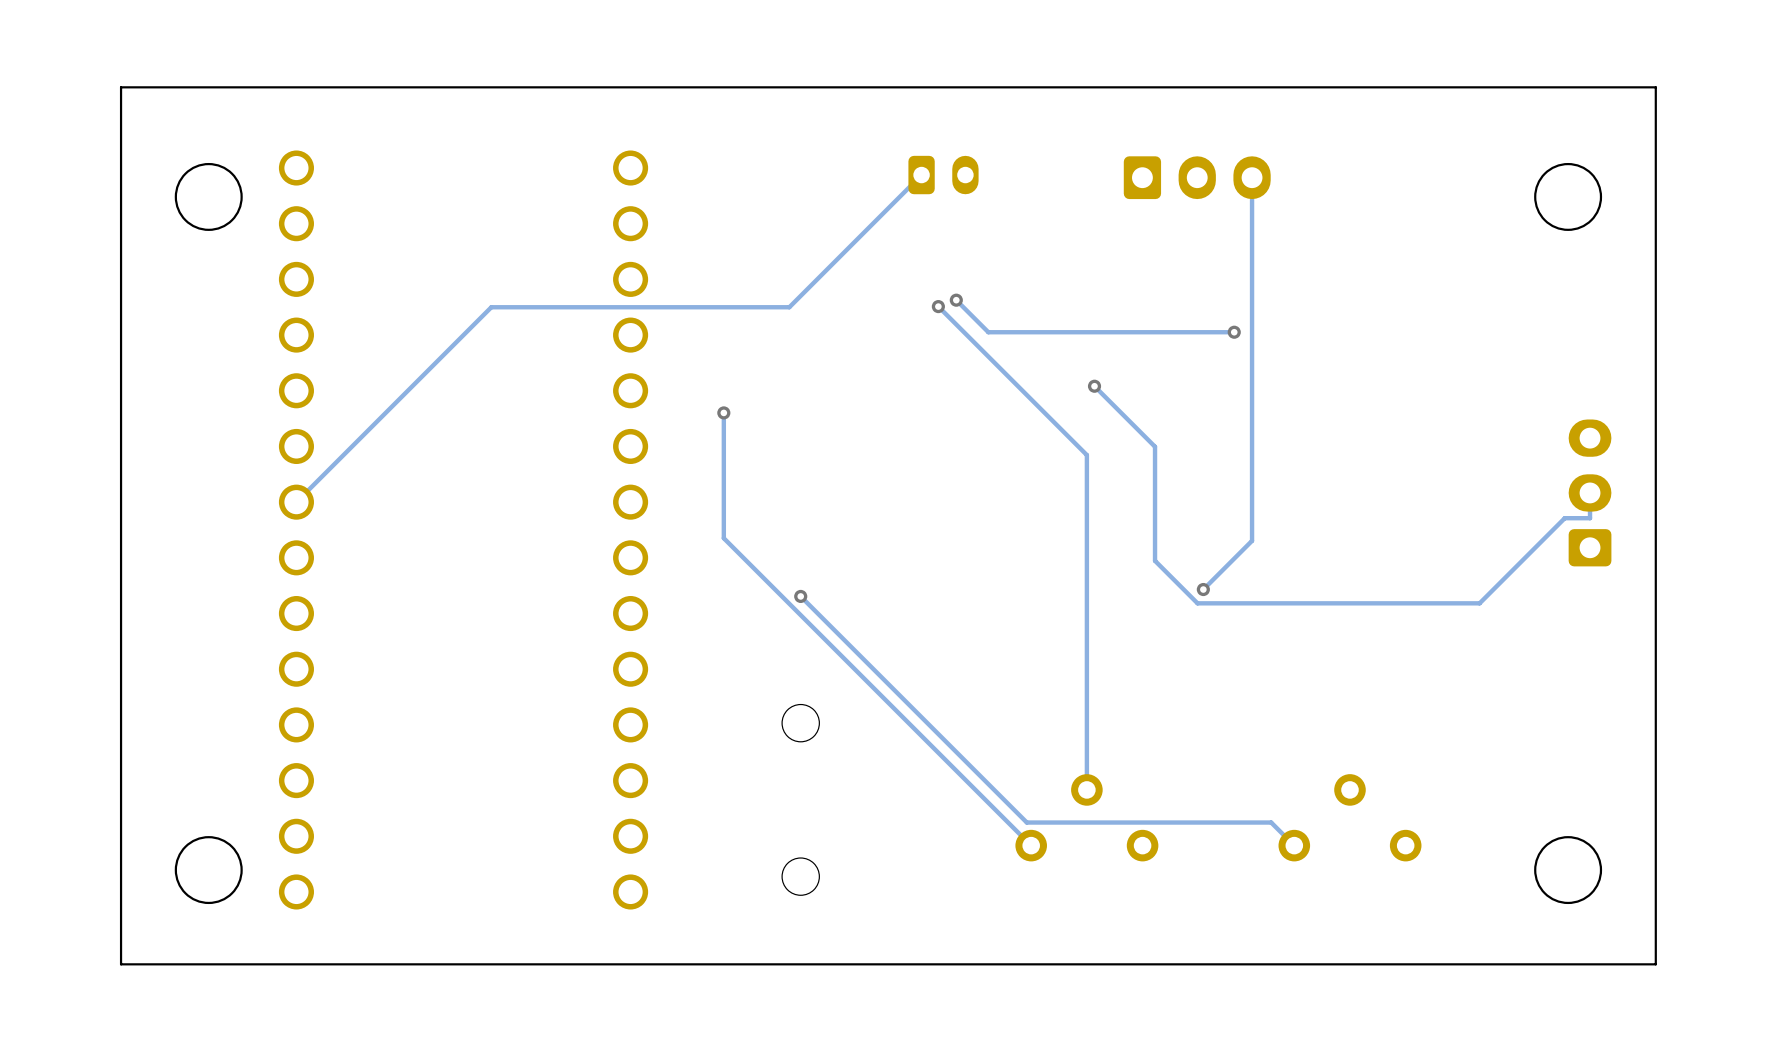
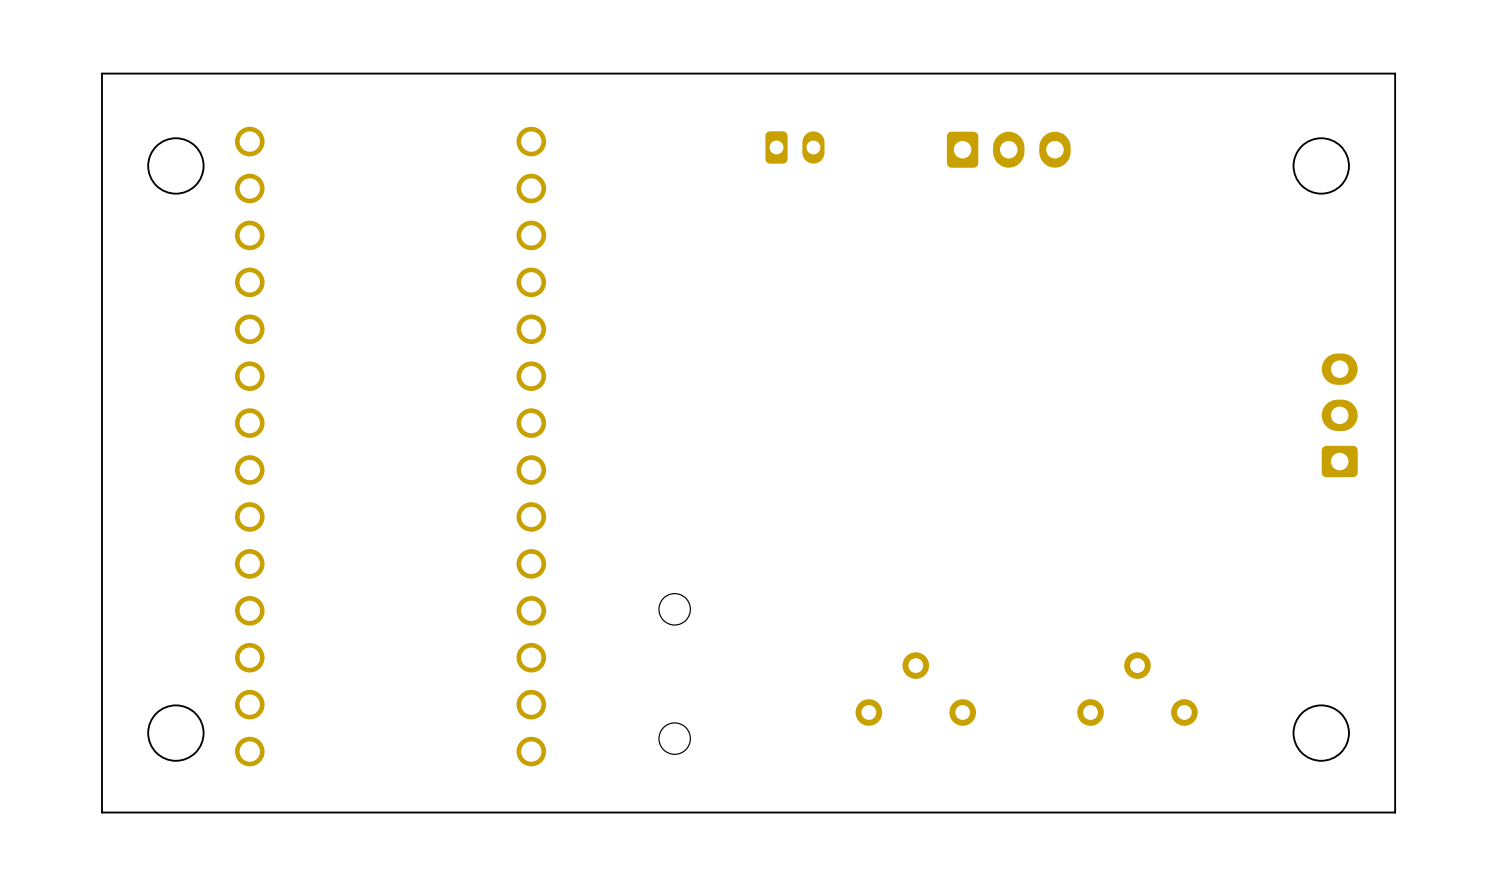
track: (921, 175) (789, 307) (491, 307) (296, 502) -> none
track: (1252, 177) (1252, 540) (1203, 589) -> none
track: (956, 300) (988, 332) (1234, 332) -> none
via: (956, 300) -> none
track: (938, 306) (1086, 455) (1086, 789) -> none
via: (938, 306) -> none
via: (1234, 332) -> none
track: (1094, 386) (1155, 446) (1155, 560) (1197, 603) (1479, 603) (1564, 518) (1590, 518) (1590, 492) -> none
via: (1094, 386) -> none
track: (723, 412) (723, 538) (1031, 845) -> none
via: (723, 412) -> none
via: (1203, 589) -> none
track: (800, 596) (1026, 822) (1271, 822) (1294, 845) -> none
via: (800, 596) -> none

